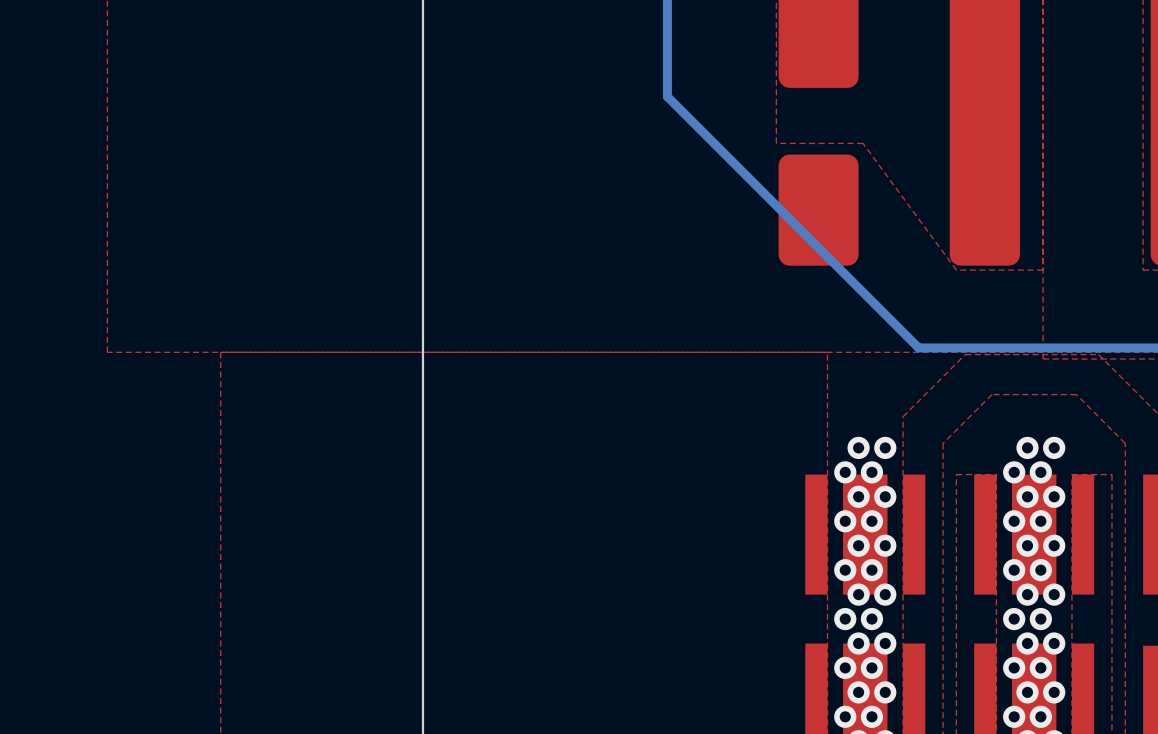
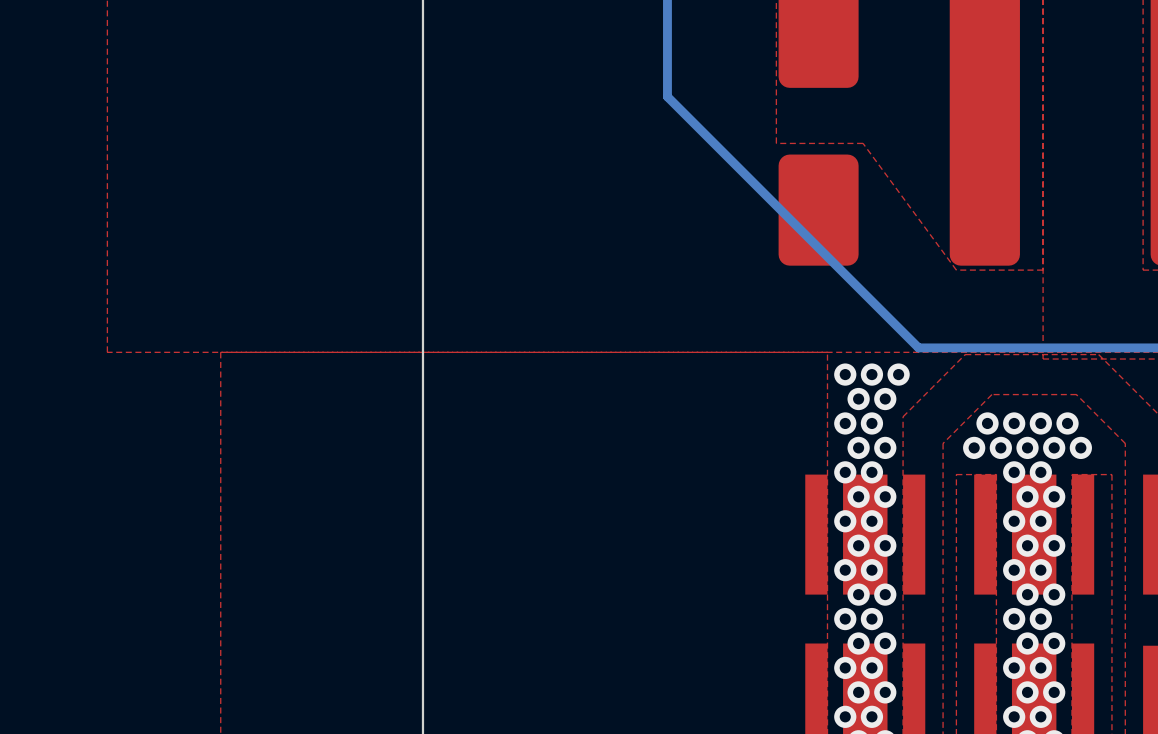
via: none -> (845, 374)
via: none -> (871, 374)
via: none -> (898, 374)
via: none -> (858, 399)
via: none -> (885, 399)
via: none -> (845, 423)
via: none -> (871, 423)
via: none -> (987, 423)
via: none -> (1014, 423)
via: none -> (1040, 423)
via: none -> (1067, 423)
via: none -> (974, 447)
via: none -> (1000, 447)
via: none -> (1080, 447)

